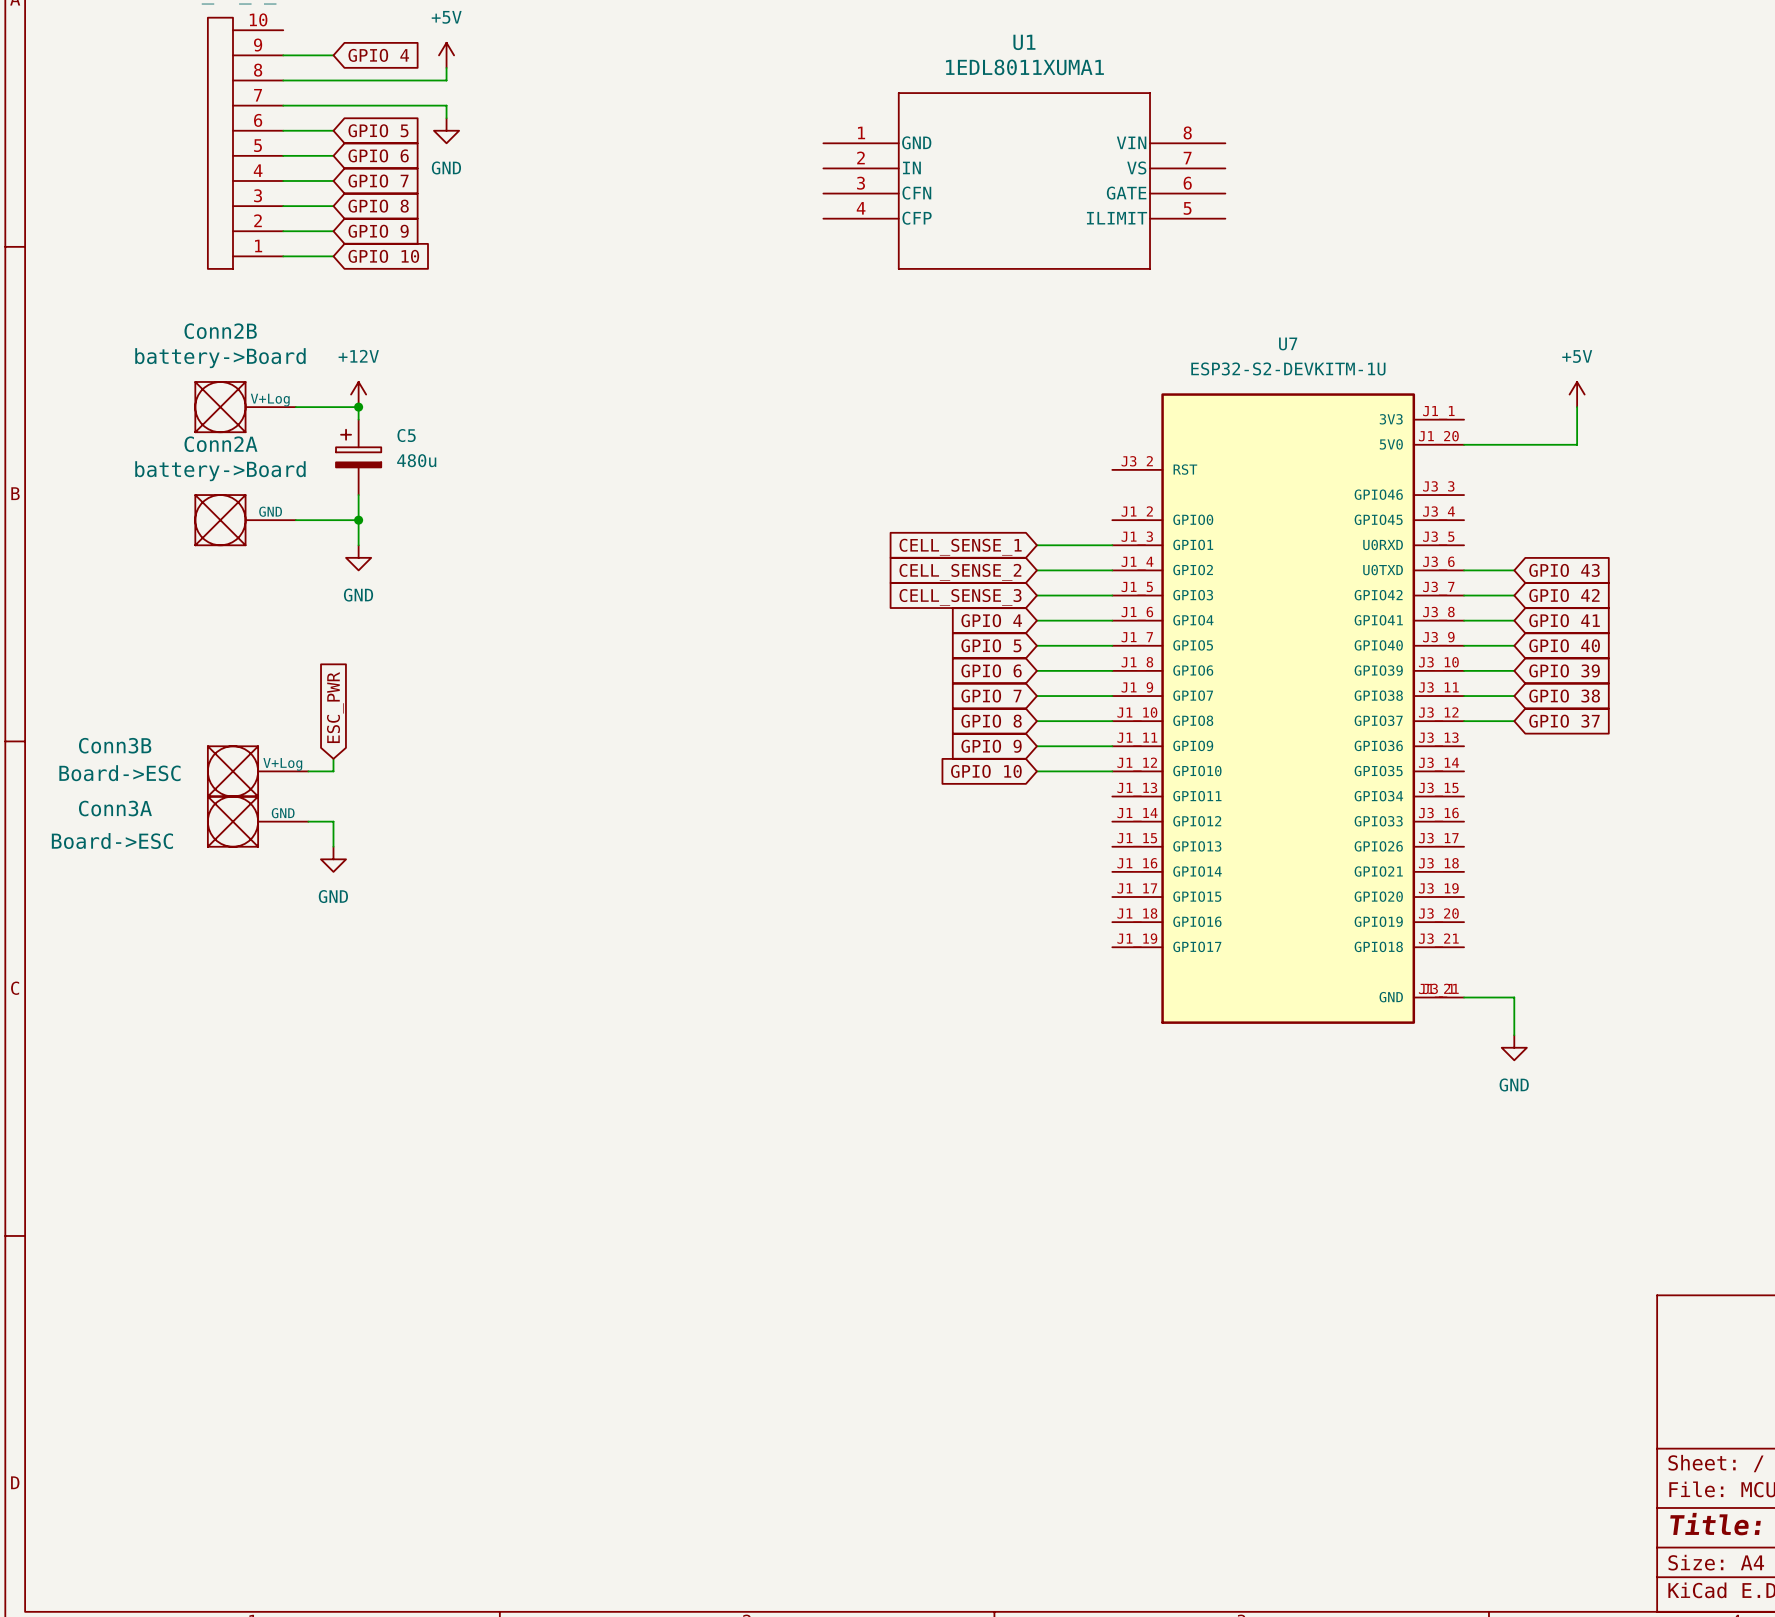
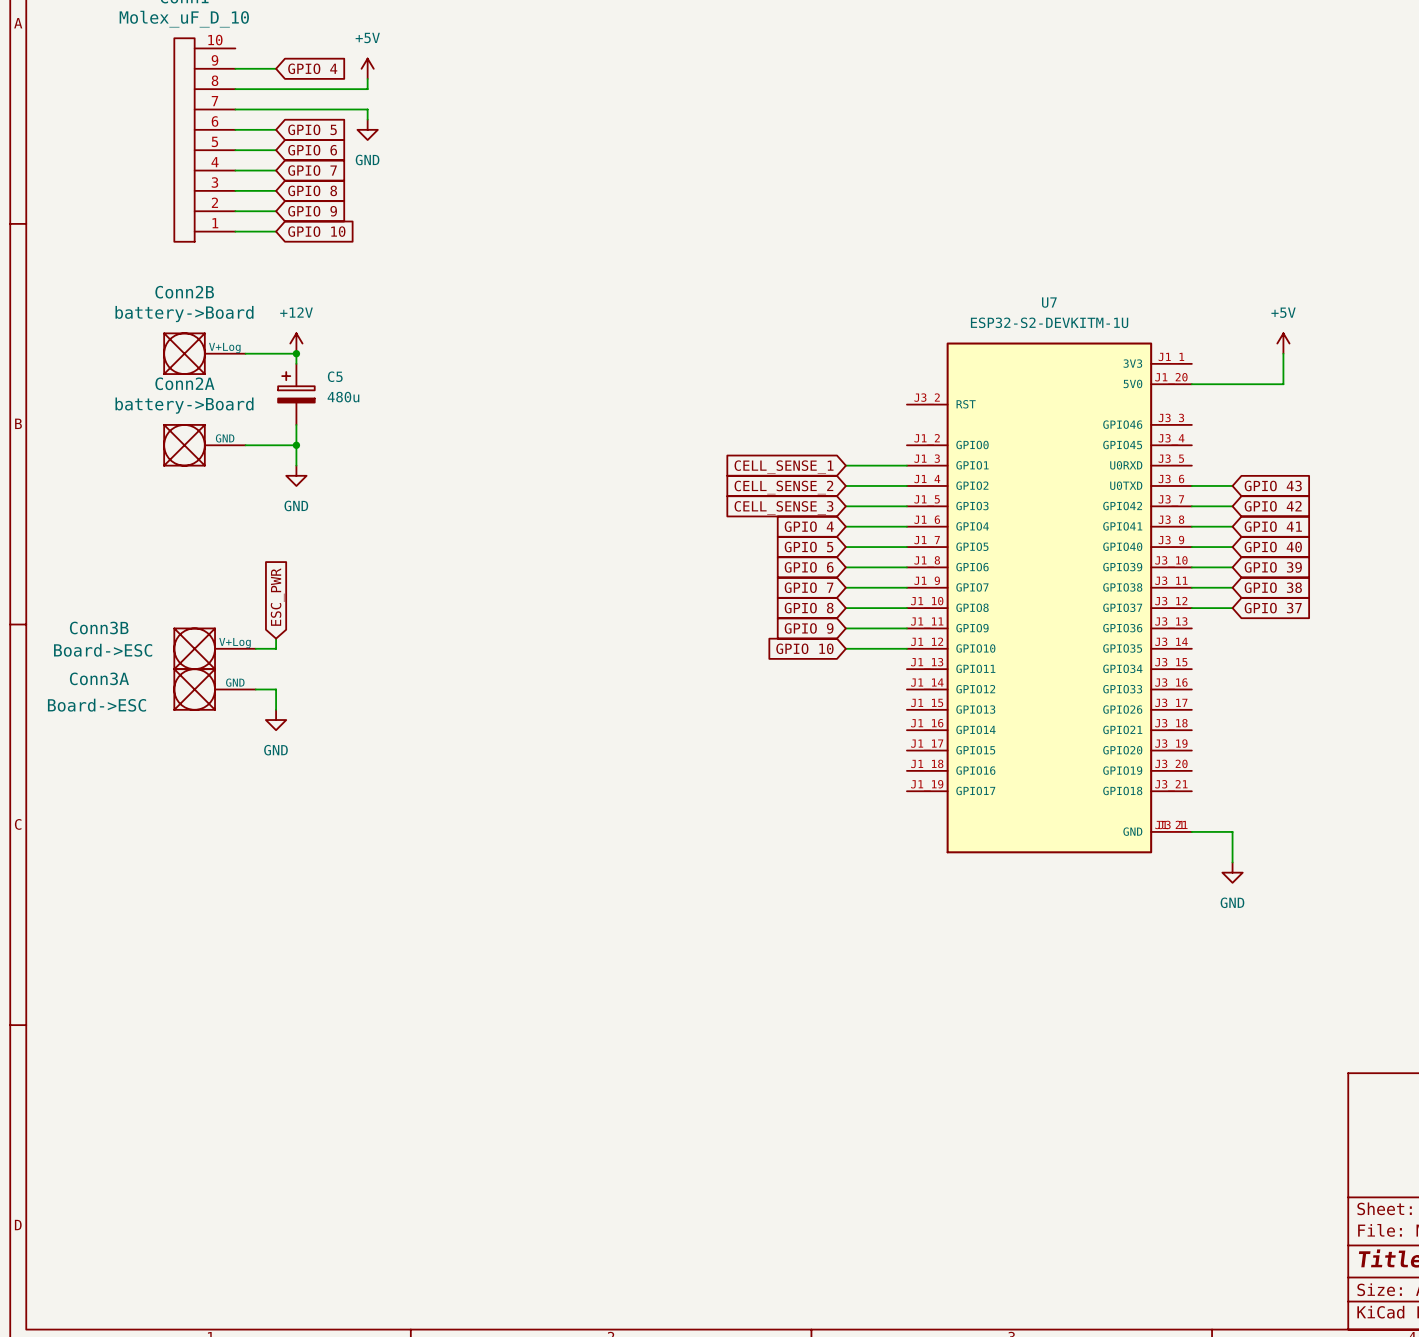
U1: 1EDL8011XUMA1 (1024, 180) -> none

